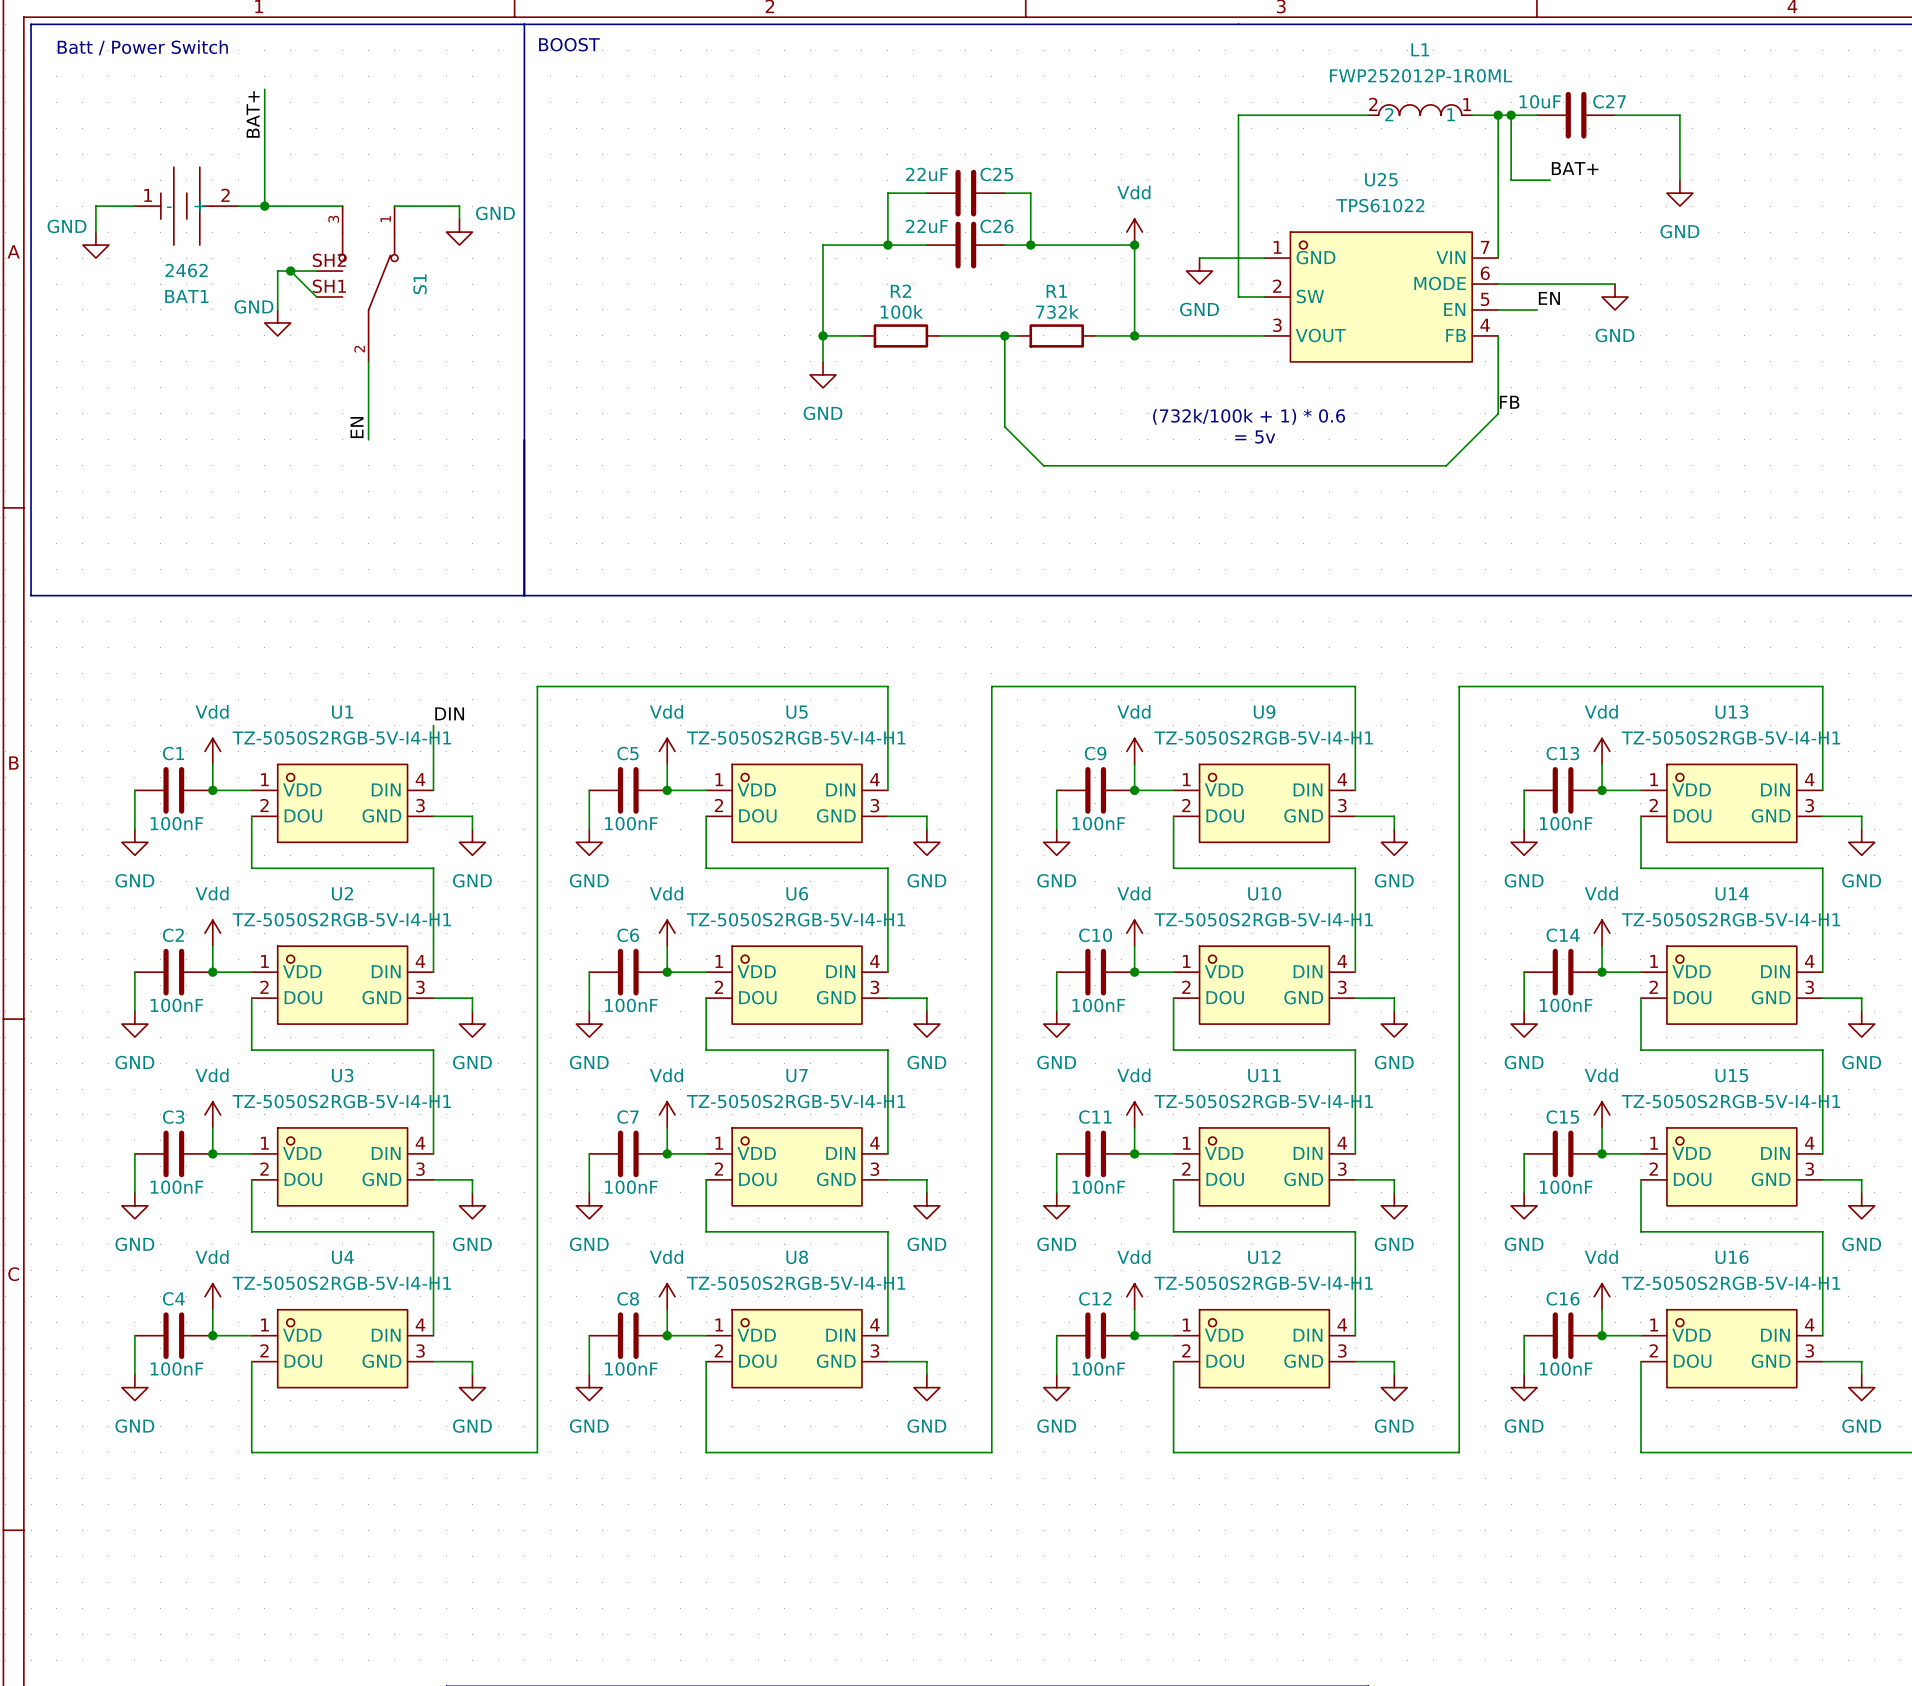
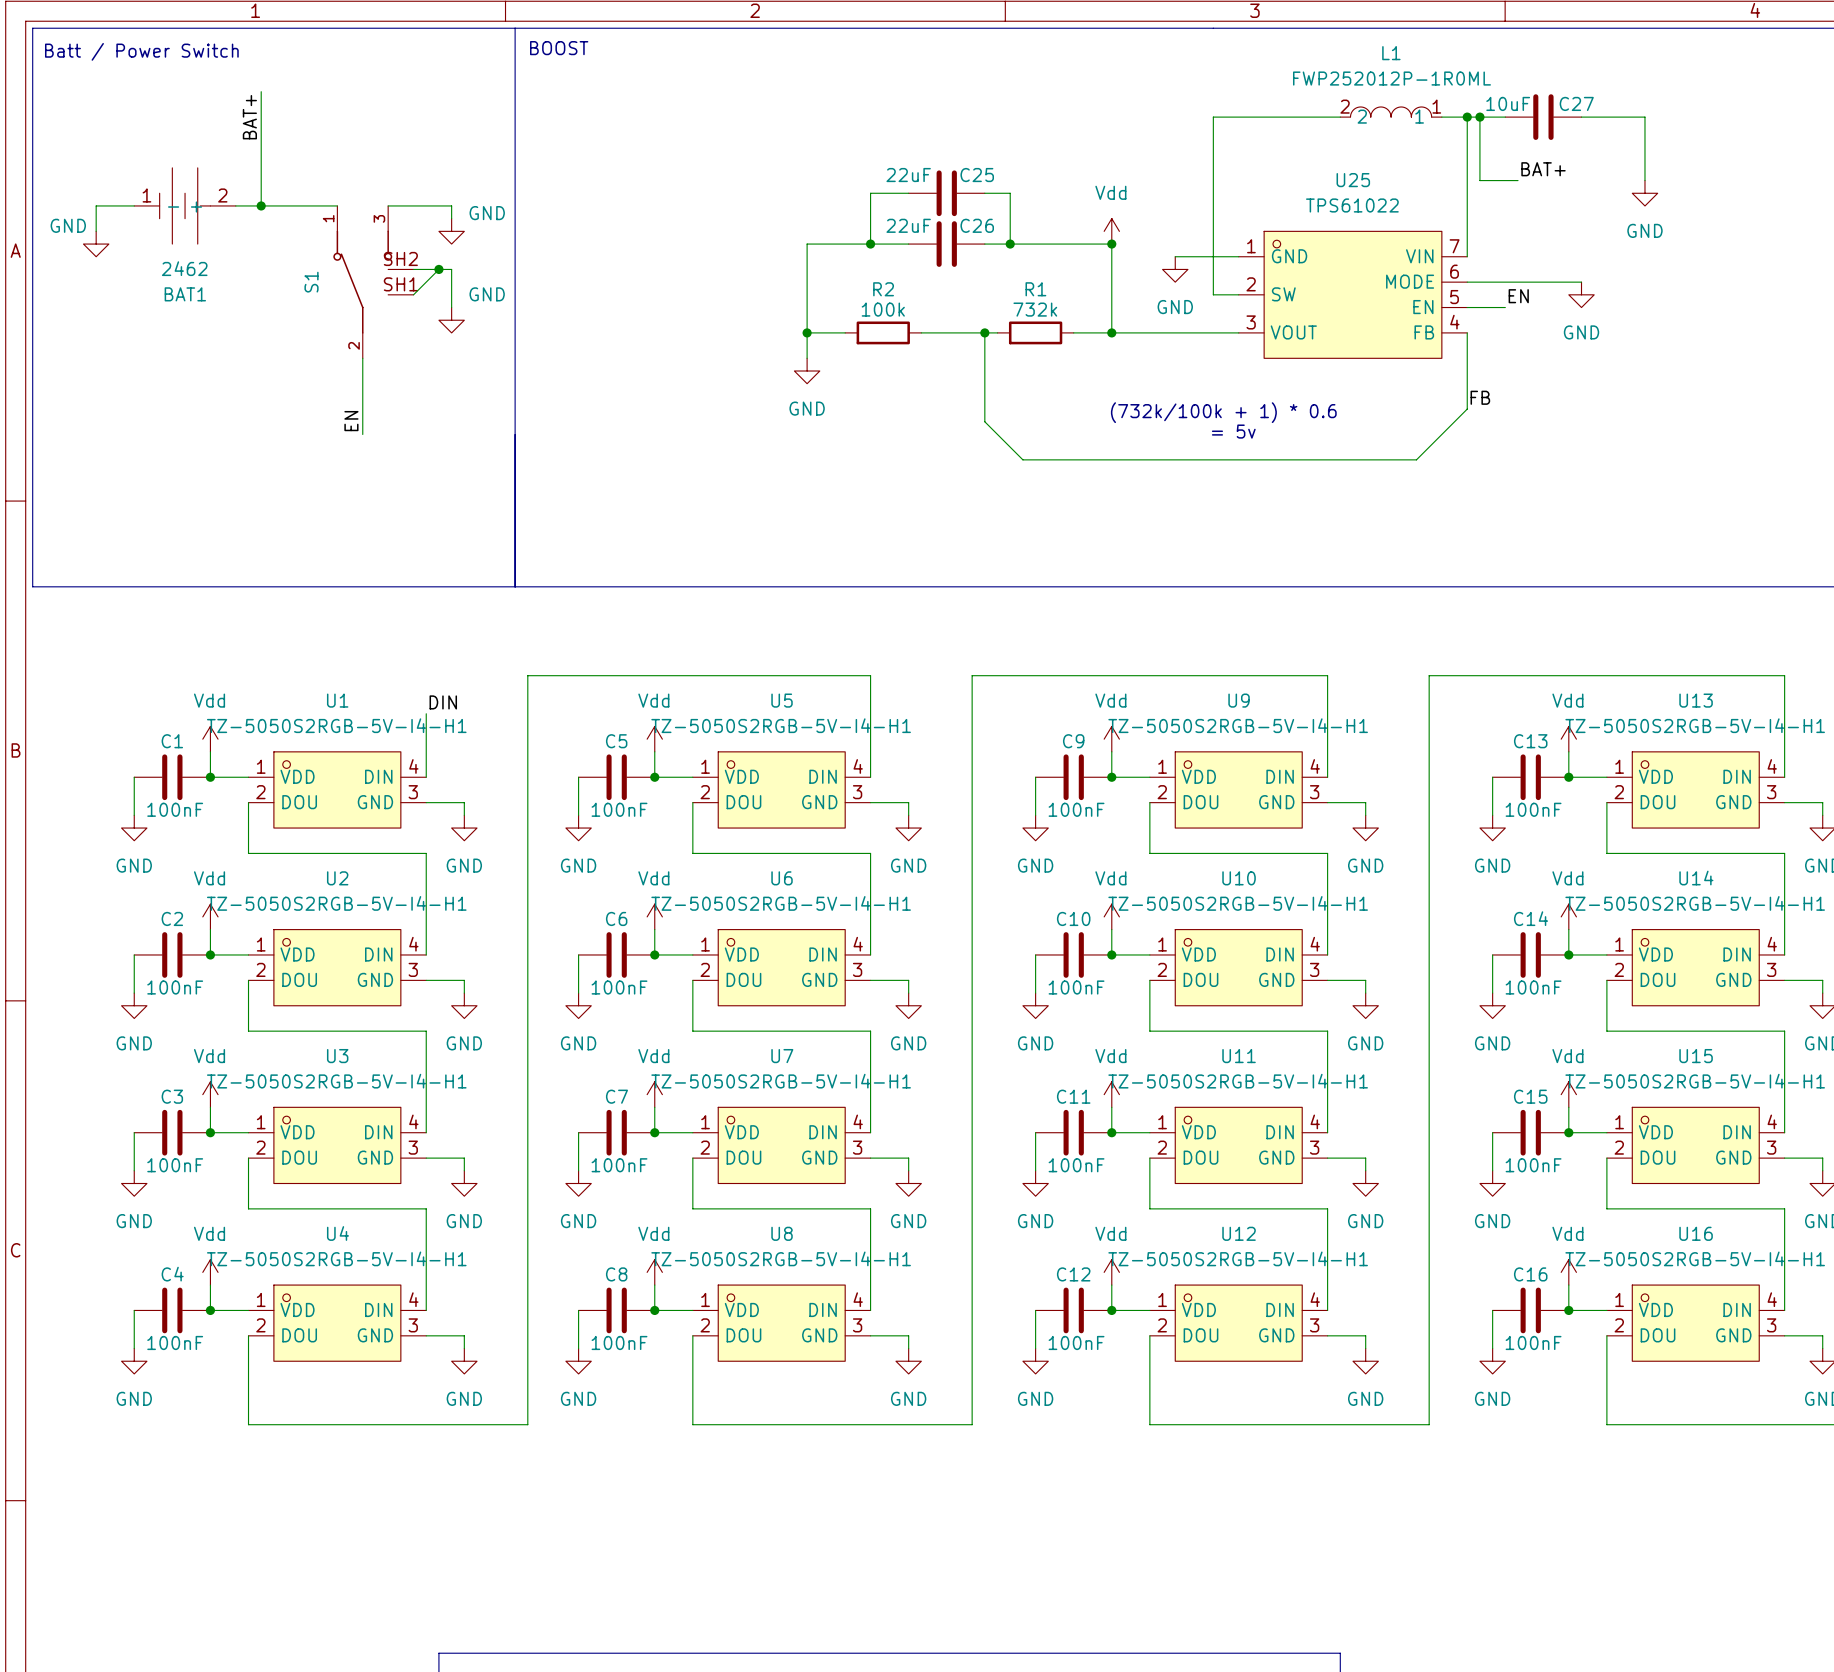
wire: (290, 271) (316, 297) -> none
junction: (290, 271) -> none
wire: (316, 271) (277, 271) (277, 309) -> none
wire: none -> (413, 269) (451, 269) (451, 307)
wire: none -> (438, 269) (413, 294)
junction: none -> (438, 269)
S1 flip: as is (368, 284) -> left-right (362, 282)
power symbol text position: GND (253, 306) -> GND (487, 294)
power symbol position: GND (277, 322) -> GND (451, 320)

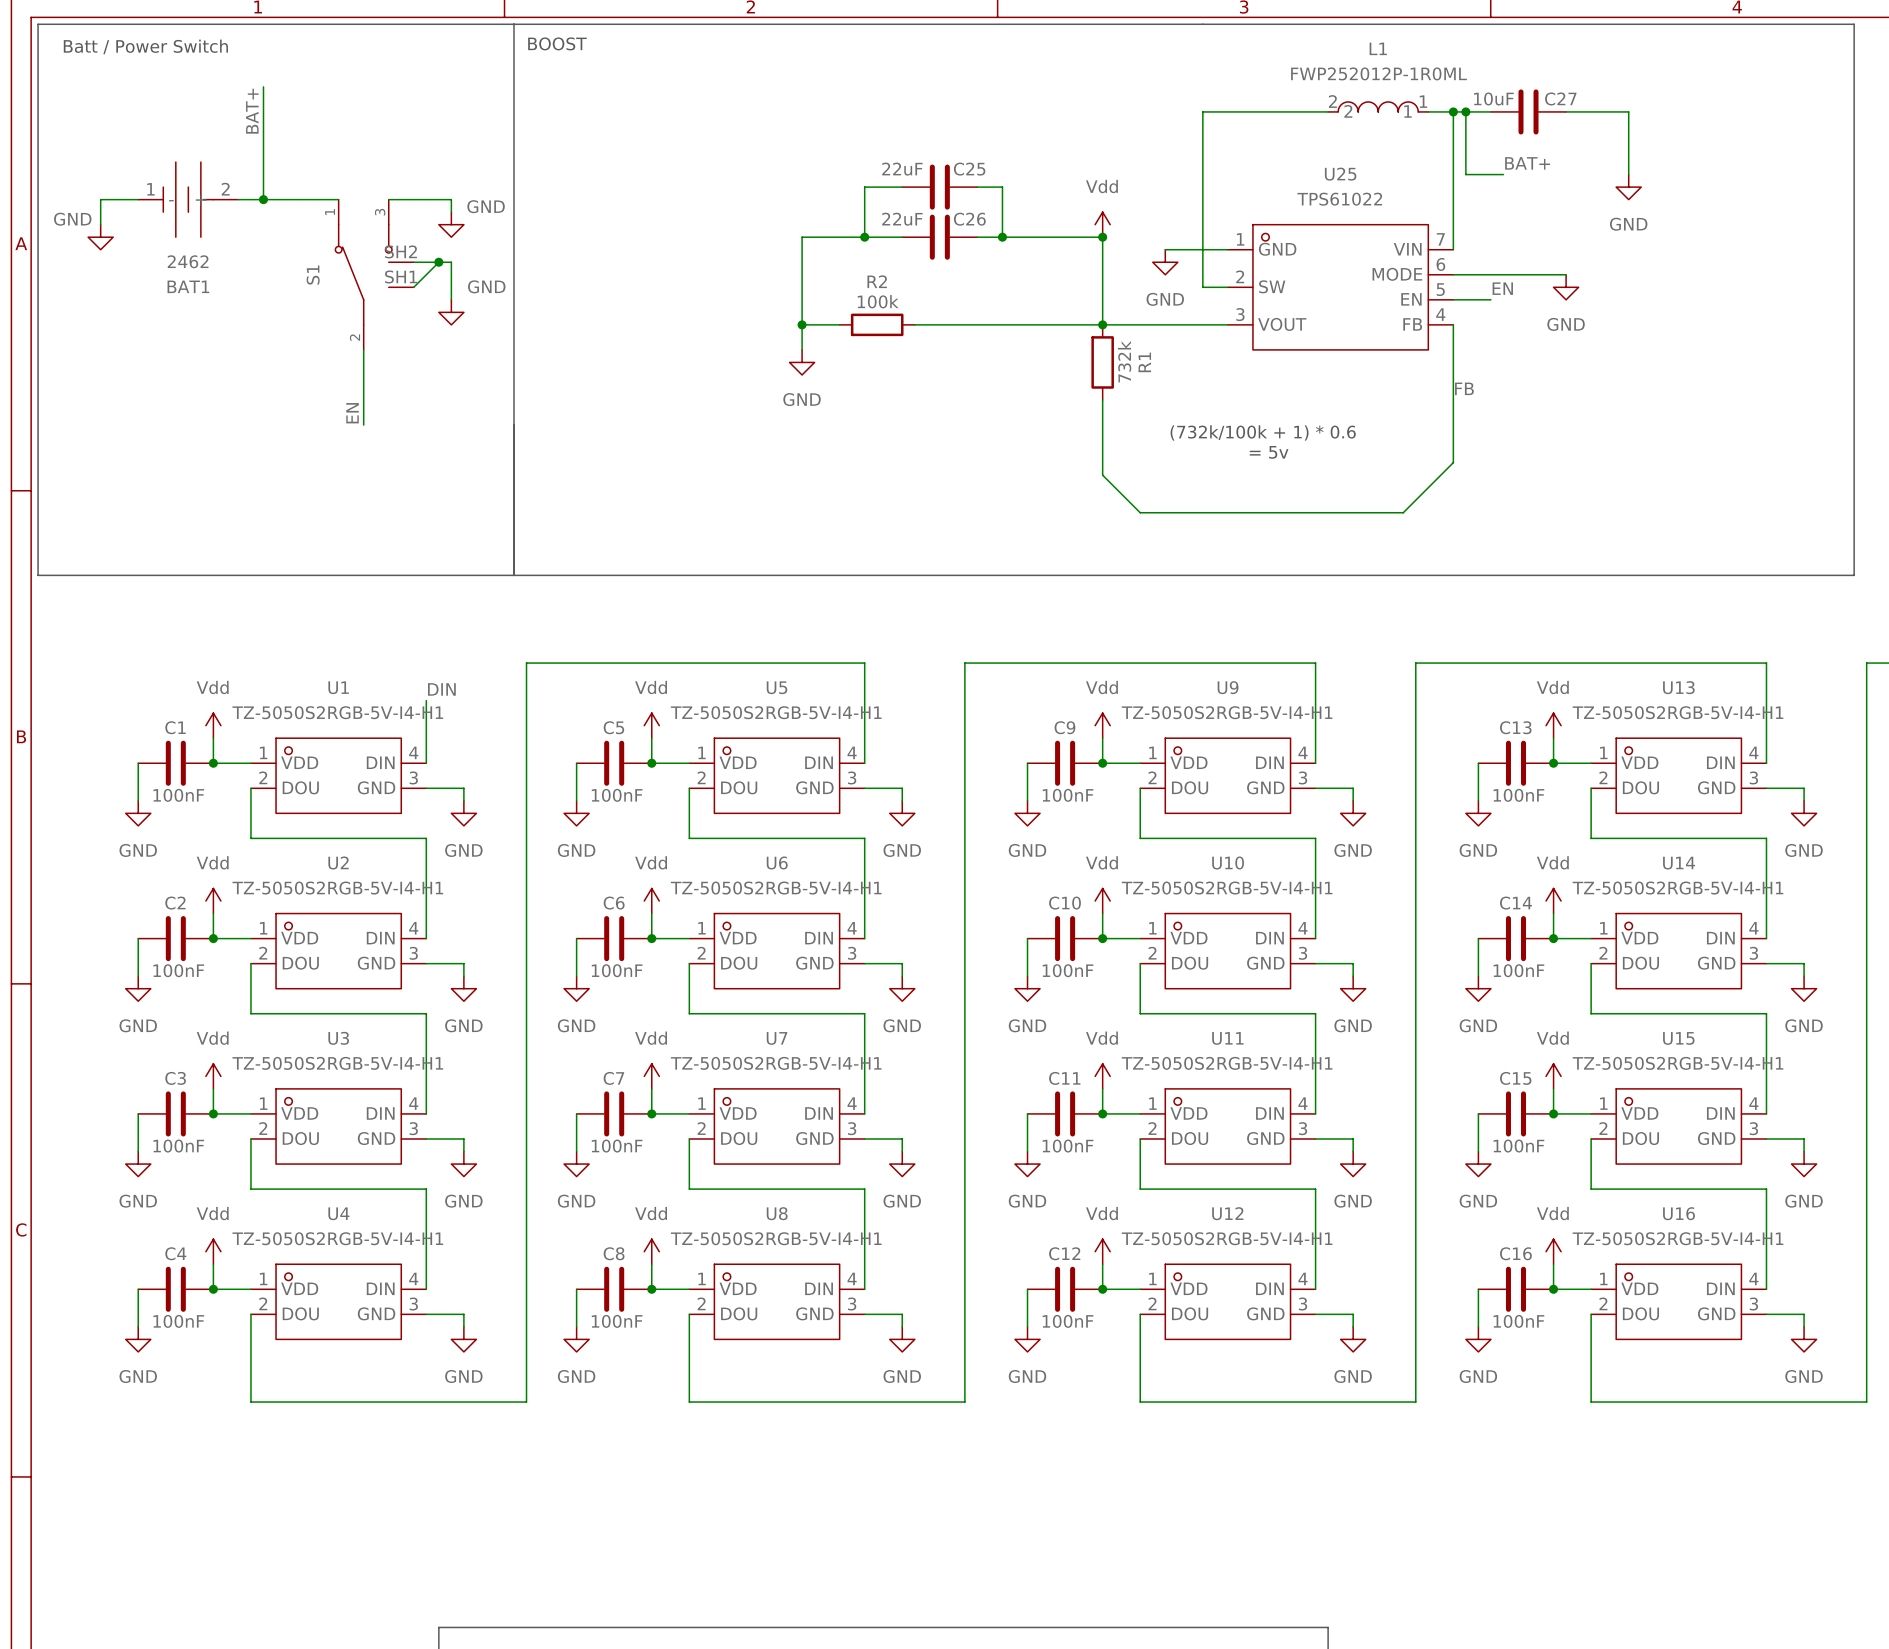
wire: (984, 332) (984, 421) (1022, 459) (1416, 459) (1467, 409) -> (1102, 400) (1102, 475) (1140, 512) (1403, 512) (1453, 462) (1453, 400)
junction: (984, 332) -> none
wire: none -> (989, 324) (1065, 324)
R1 rotation: 0° (1035, 332) -> 90° clockwise (1102, 362)
R1 position: (1035, 332) -> (1102, 362)
text position: (732k/100k + 1) * 0.6 (1223, 412) -> (732k/100k + 1) * 0.6 (1263, 432)
text position: = 5v (1233, 431) -> = 5v (1269, 452)

